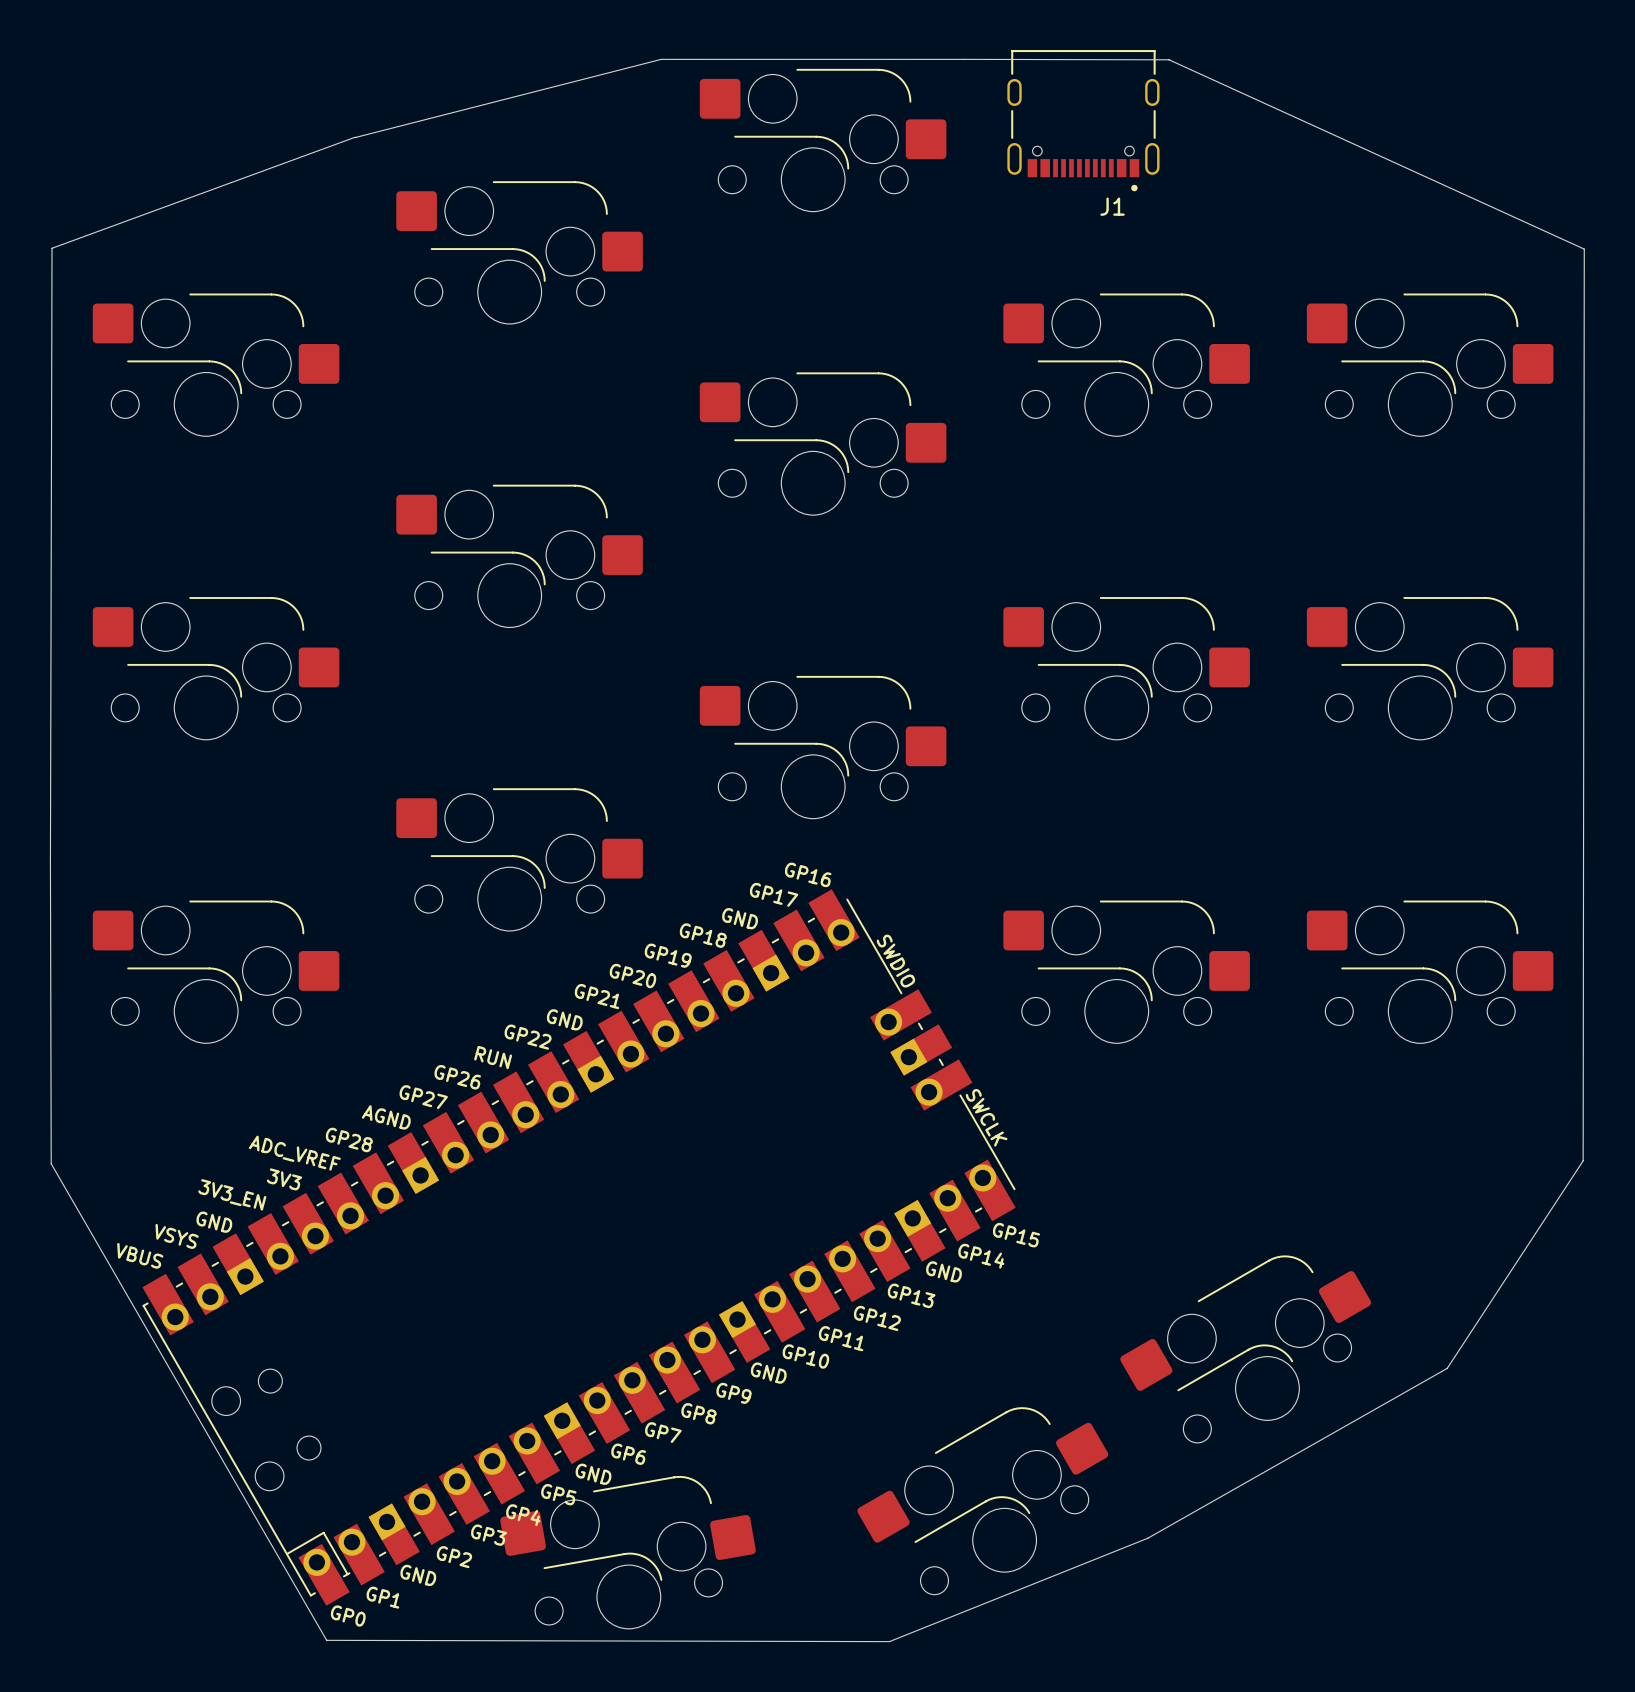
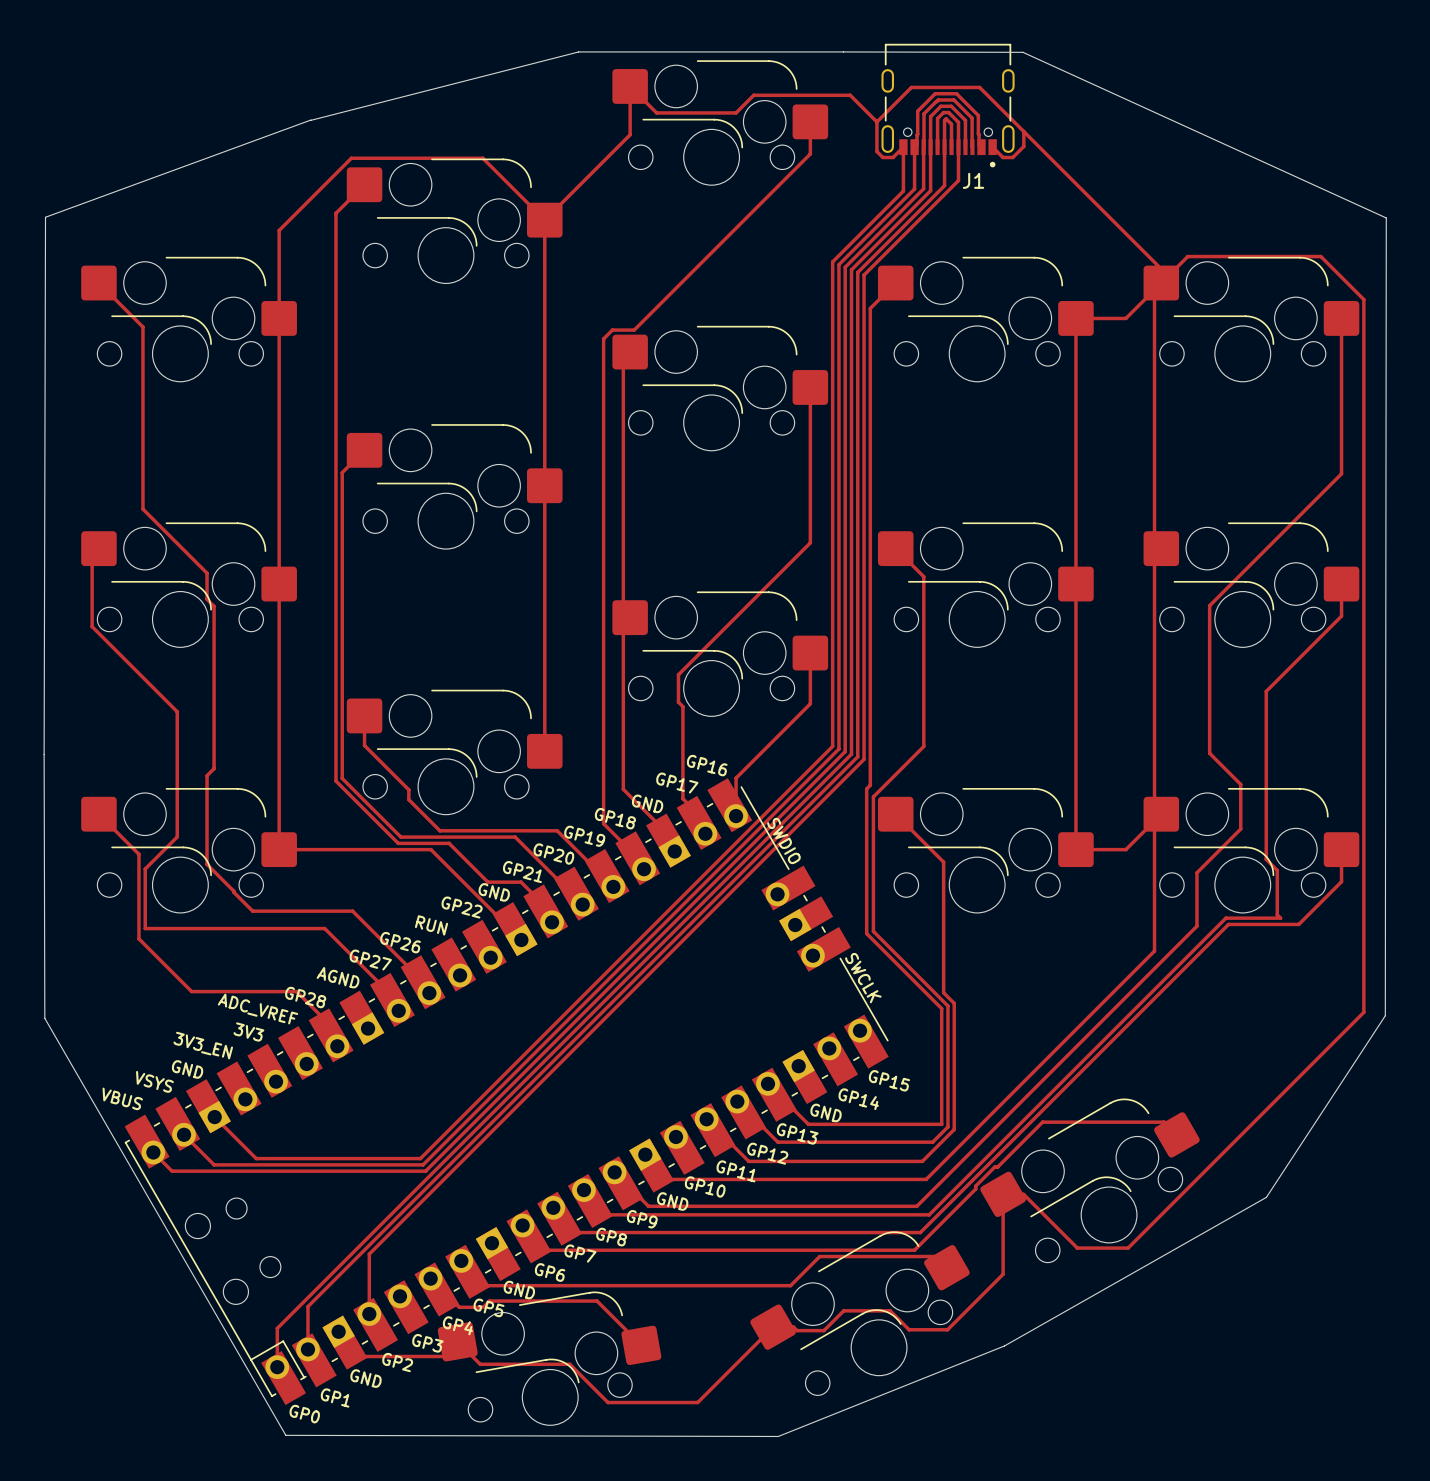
track: none -> (810, 121) (810, 153) (634, 330) (612, 330) (603, 338) (603, 823) (644, 864) (644, 869)
track: none -> (876, 121) (876, 151) (882, 157) (893, 157) (903, 147) (903, 191) (832, 261) (832, 746) (420, 1158) (256, 1158) (214, 1117)
track: none -> (876, 121) (850, 95) (753, 95) (736, 112) (656, 112) (630, 86) (630, 134) (544, 220)
track: none -> (876, 121) (911, 87) (979, 87) (1161, 269) (1161, 283)
track: none -> (1023, 131) (1023, 146) (1012, 157) (1003, 157) (992, 147)
track: none -> (937, 147) (937, 118) (943, 112) (948, 112) (958, 122) (958, 180) (864, 275) (864, 759) (369, 1254) (369, 1314)
track: none -> (951, 147) (951, 124) (946, 118) (944, 120) (944, 185) (857, 272) (857, 756) (307, 1306) (307, 1349)
track: none -> (965, 147) (965, 120) (951, 106) (940, 106) (930, 116) (930, 190) (851, 269) (851, 754) (277, 1328) (277, 1367)
track: none -> (972, 147) (972, 118) (953, 100) (936, 101) (923, 113) (923, 188) (845, 267) (845, 751) (425, 1171) (172, 1171) (153, 1152)
track: none -> (981, 147) (979, 144) (978, 115) (956, 93) (935, 93) (917, 111) (917, 144) (914, 147) (914, 189) (838, 264) (838, 748) (423, 1164) (214, 1164) (184, 1134)
track: none -> (364, 184) (335, 213) (335, 781) (398, 843) (449, 843) (487, 882) (521, 882) (552, 913) (552, 922)
track: none -> (544, 220) (544, 751)
track: none -> (544, 220) (482, 158) (351, 158) (279, 230) (279, 849) (431, 849) (521, 940)
track: none -> (98, 283) (142, 327) (142, 509) (207, 573) (207, 599) (214, 606) (214, 768) (207, 775) (207, 864) (252, 911) (352, 911) (429, 987) (429, 993)
track: none -> (895, 283) (870, 308) (870, 785) (866, 788) (866, 933) (941, 1008) (941, 1124) (808, 1124) (768, 1083)
track: none -> (1154, 289) (1154, 541) (1161, 548) (1154, 555) (1154, 807) (1161, 814) (1125, 849) (1075, 849) (1075, 318) (1125, 318) (1187, 256) (1320, 256) (1363, 299) (1363, 1012) (1128, 1248) (1077, 1248) (1023, 1194) (1003, 1194) (1003, 1274) (947, 1329) (909, 1329) (890, 1310) (843, 1310) (823, 1330) (797, 1330) (793, 1327) (773, 1327) (697, 1402) (608, 1402) (569, 1364) (480, 1364) (457, 1341) (443, 1356) (363, 1356) (338, 1331)
track: none -> (1341, 318) (1341, 473) (1209, 605) (1209, 753) (1240, 784) (1240, 829) (1196, 872) (1196, 926) (916, 1206) (648, 1206) (614, 1172)
track: none -> (630, 352) (623, 358) (623, 610) (630, 617) (623, 624) (623, 789) (674, 840) (674, 851)
track: none -> (810, 387) (810, 542) (678, 674) (678, 702) (682, 706) (682, 798) (705, 821) (705, 833)
track: none -> (364, 450) (342, 472) (342, 778) (400, 837) (515, 837) (582, 904)
track: none -> (98, 548) (92, 555) (92, 626) (177, 711) (177, 836) (145, 869) (145, 928) (324, 928) (398, 1002) (398, 1010)
track: none -> (895, 548) (923, 576) (923, 746) (873, 796) (873, 931) (947, 1006) (947, 1126) (932, 1142) (777, 1142) (737, 1101)
track: none -> (1341, 584) (1341, 616) (1266, 691) (1266, 859) (1277, 870) (1277, 914) (1280, 918) (1225, 918) (929, 1214) (608, 1214) (583, 1190)
track: none -> (810, 653) (810, 703) (736, 778) (736, 816)
track: none -> (364, 715) (364, 745) (408, 789) (408, 799) (439, 830) (557, 830) (613, 886)
track: none -> (98, 814) (138, 854) (138, 938) (191, 991) (296, 991) (337, 1032) (337, 1046)
track: none -> (895, 814) (943, 862) (943, 992) (954, 1003) (954, 1129) (922, 1161) (748, 1161) (706, 1119)
track: none -> (1154, 821) (1154, 951) (926, 1179) (670, 1179) (645, 1154)
track: none -> (1341, 849) (1341, 881) (1298, 924) (1228, 924) (920, 1232) (578, 1232) (553, 1207)
track: none -> (1176, 1134) (1164, 1122) (1042, 1122) (997, 1167) (994, 1167) (975, 1186) (975, 1189) (914, 1250) (547, 1250) (522, 1225)
track: none -> (461, 1260) (486, 1285) (790, 1285) (819, 1256) (935, 1256) (946, 1267)
track: none -> (430, 1278) (459, 1307) (483, 1307) (489, 1301) (597, 1301) (641, 1345)

